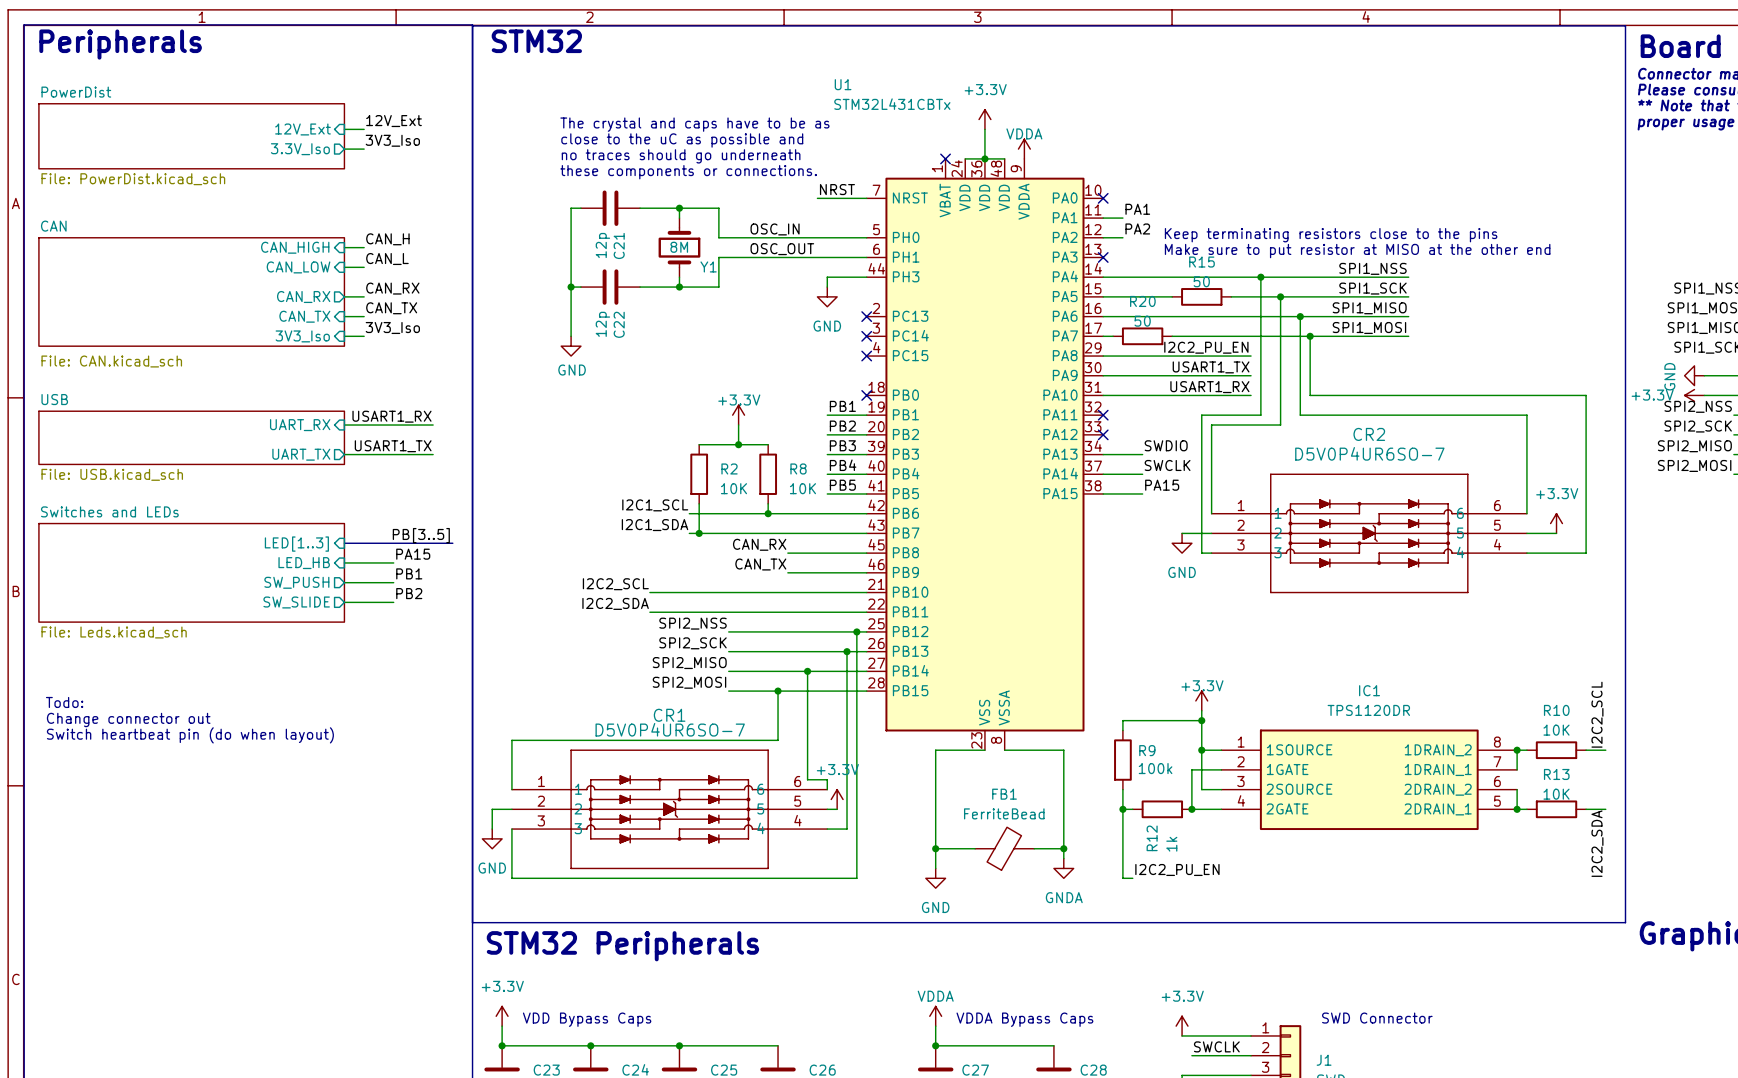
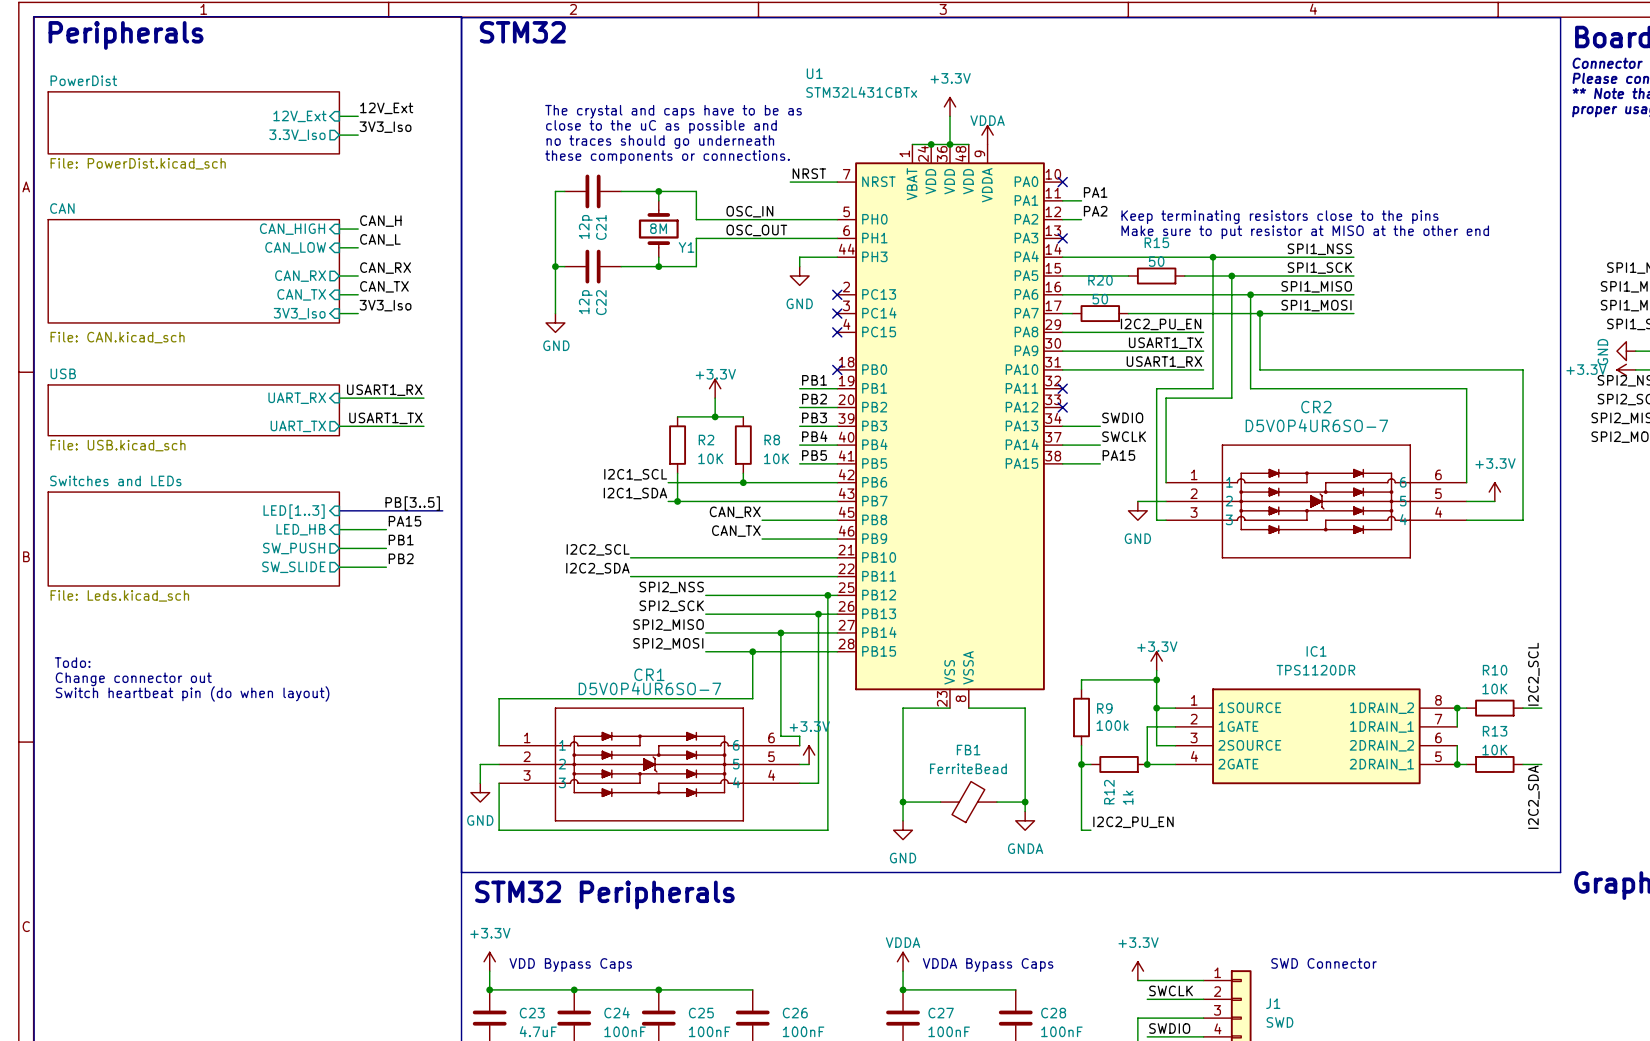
wire: none -> (912, 144) (931, 144)
no-connect mark: (945, 158) -> none
junction: none -> (931, 144)

